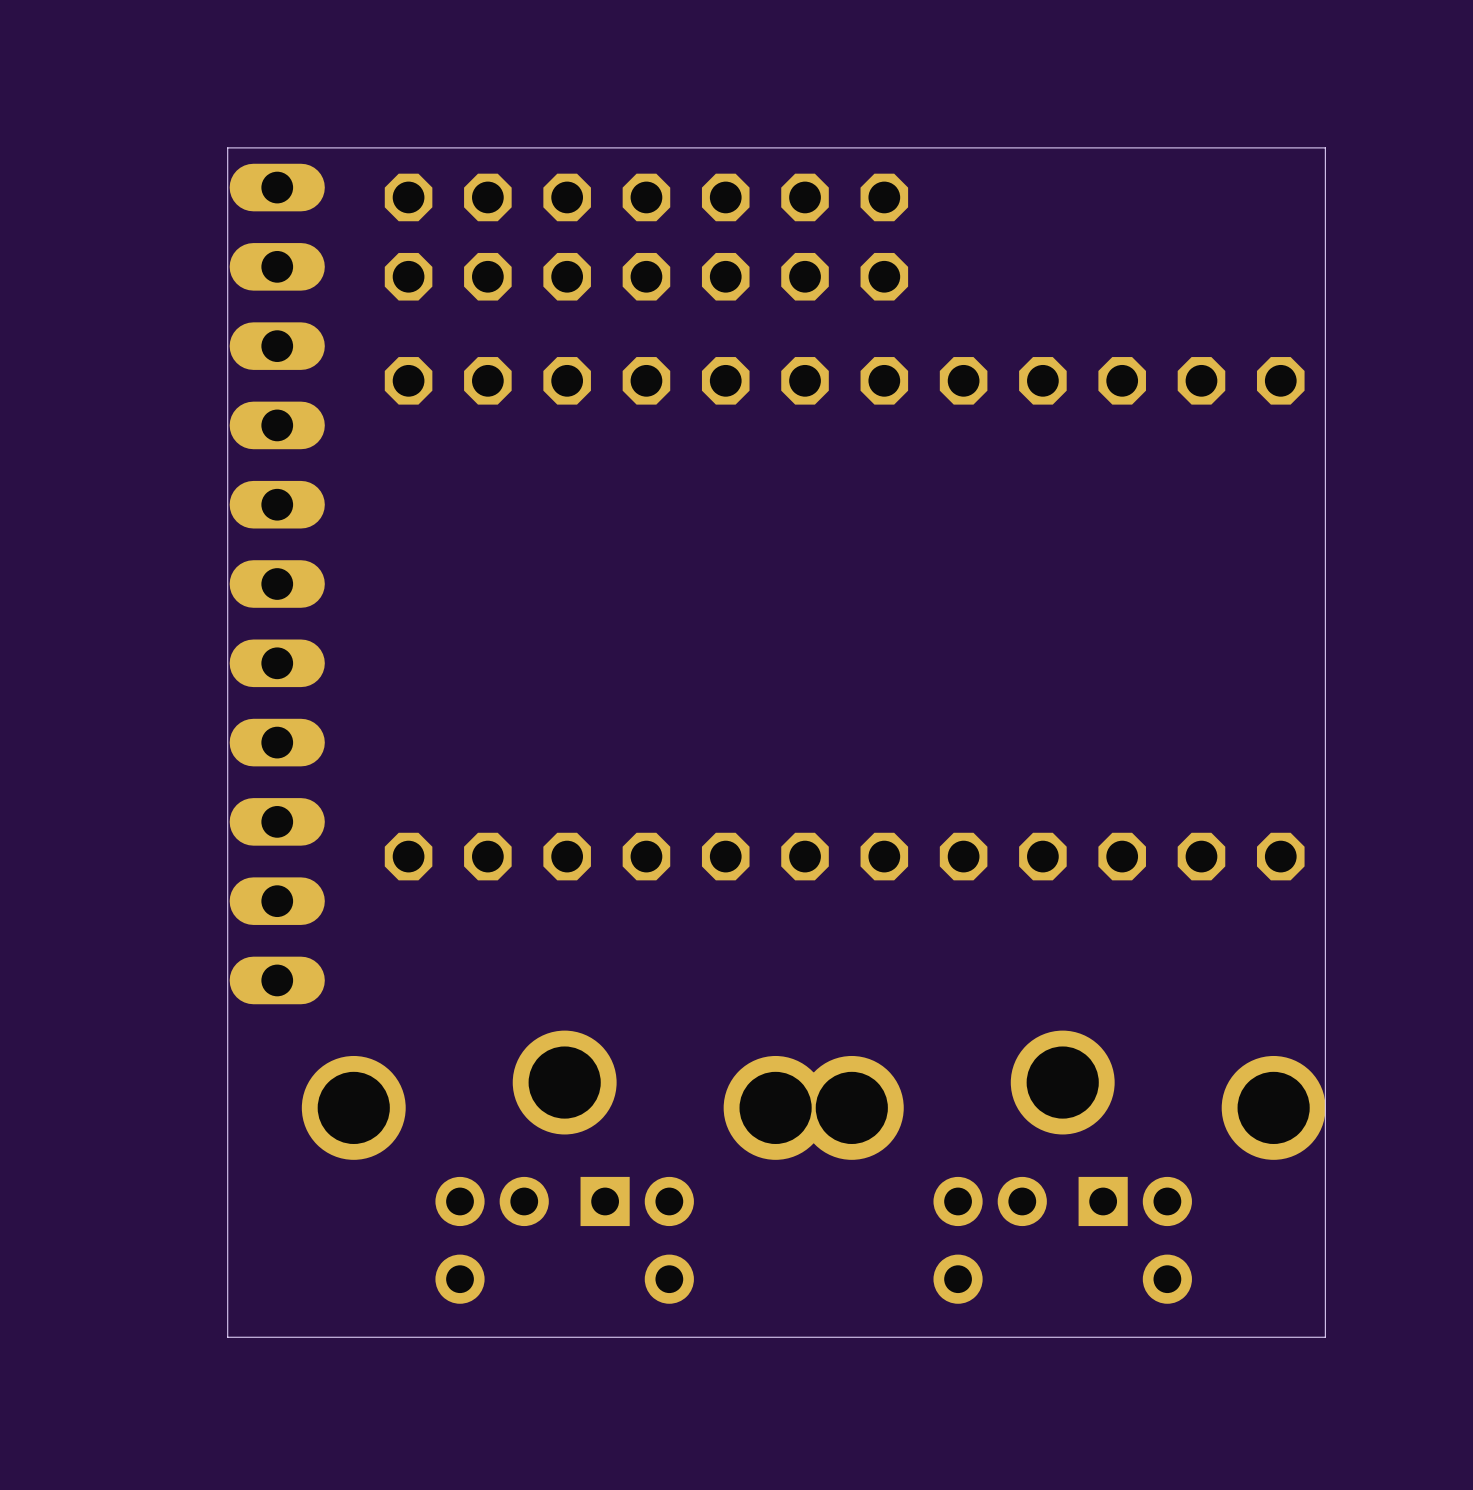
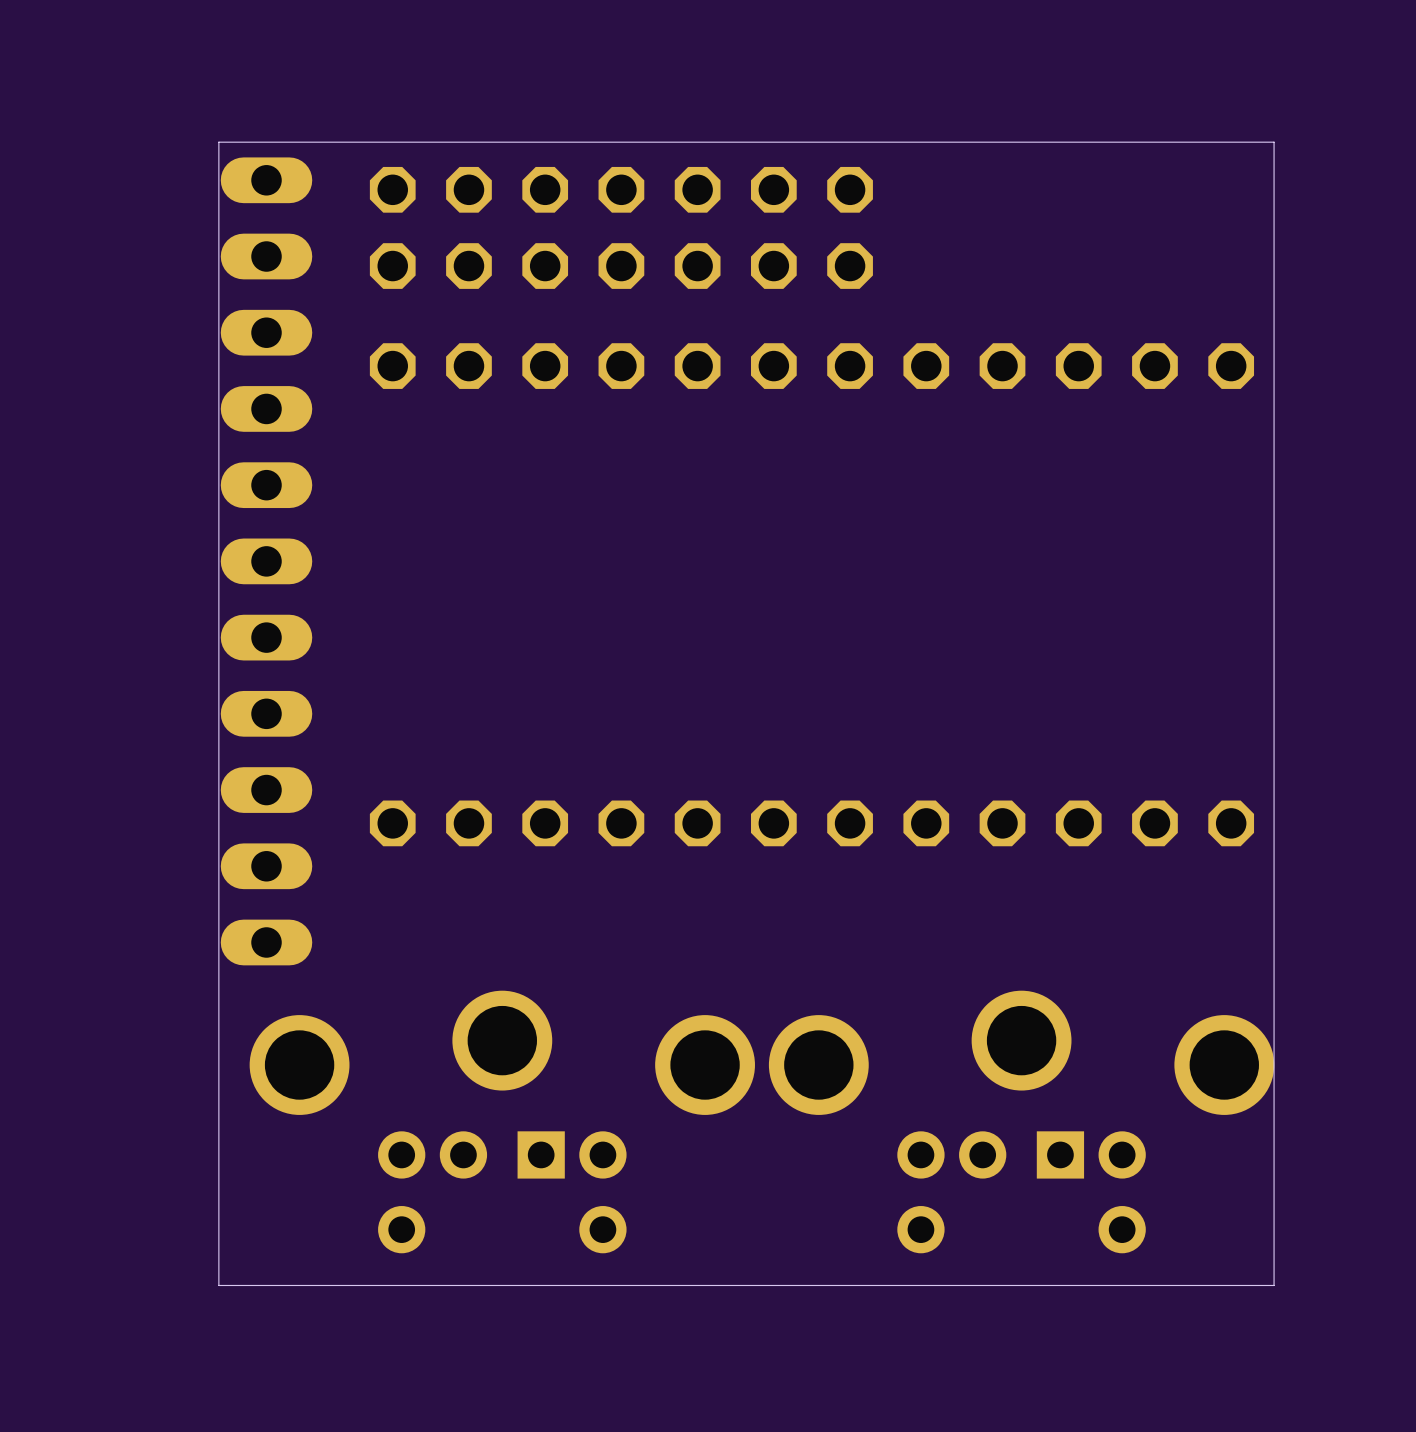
part position: (564, 1167) -> (502, 1121)

